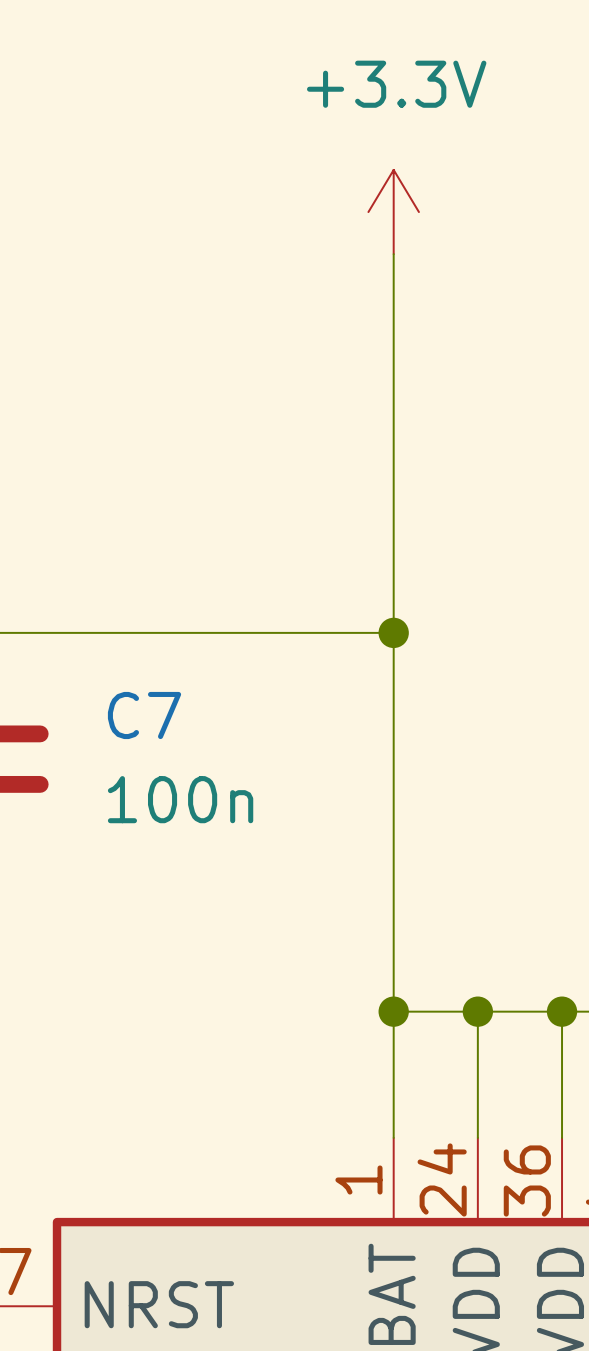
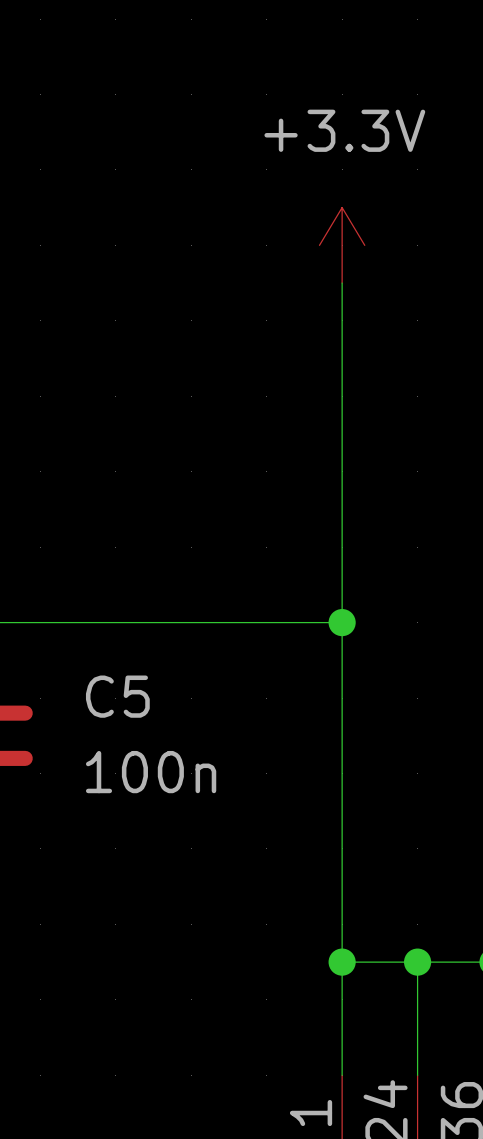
C7 name: C7 (144, 715) -> C5 (117, 696)

